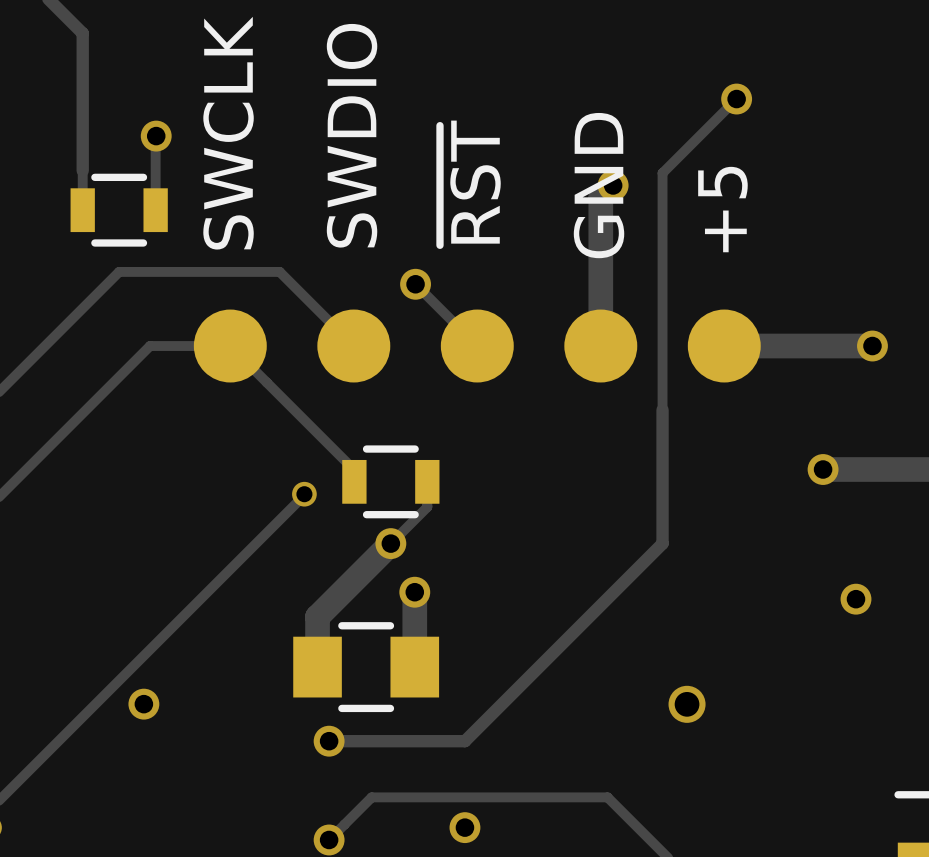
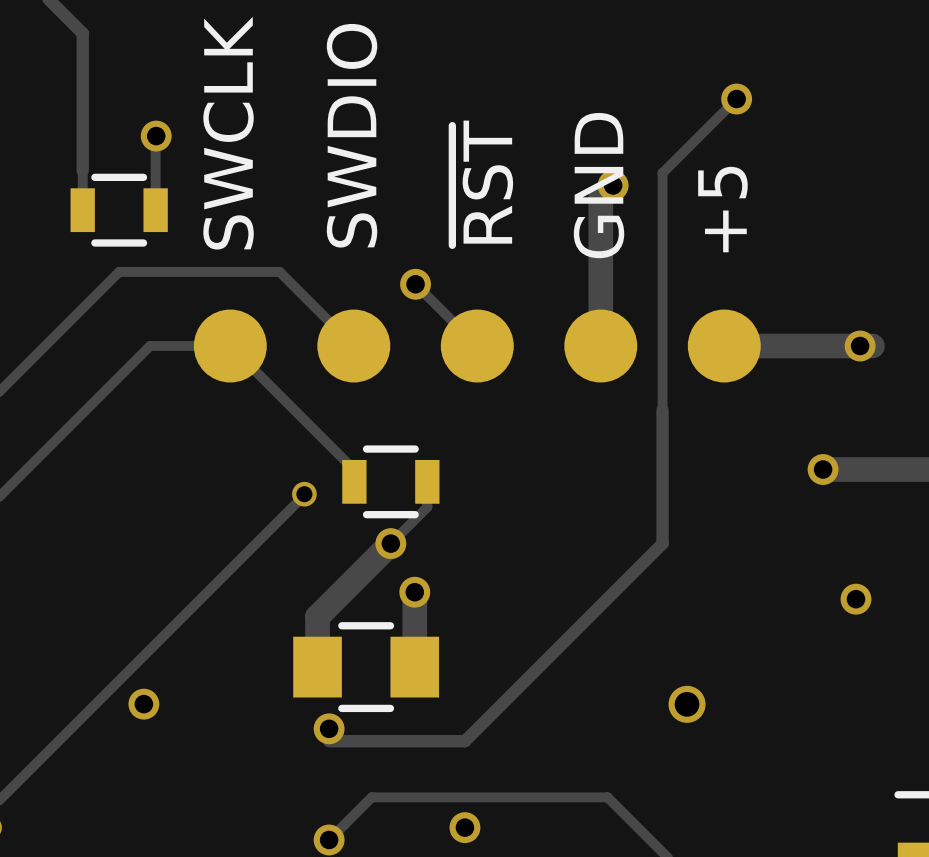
text position: ~{RST} (470, 182) -> ~{RST} (482, 182)
via position: (872, 346) -> (860, 346)
via position: (329, 741) -> (329, 728)

